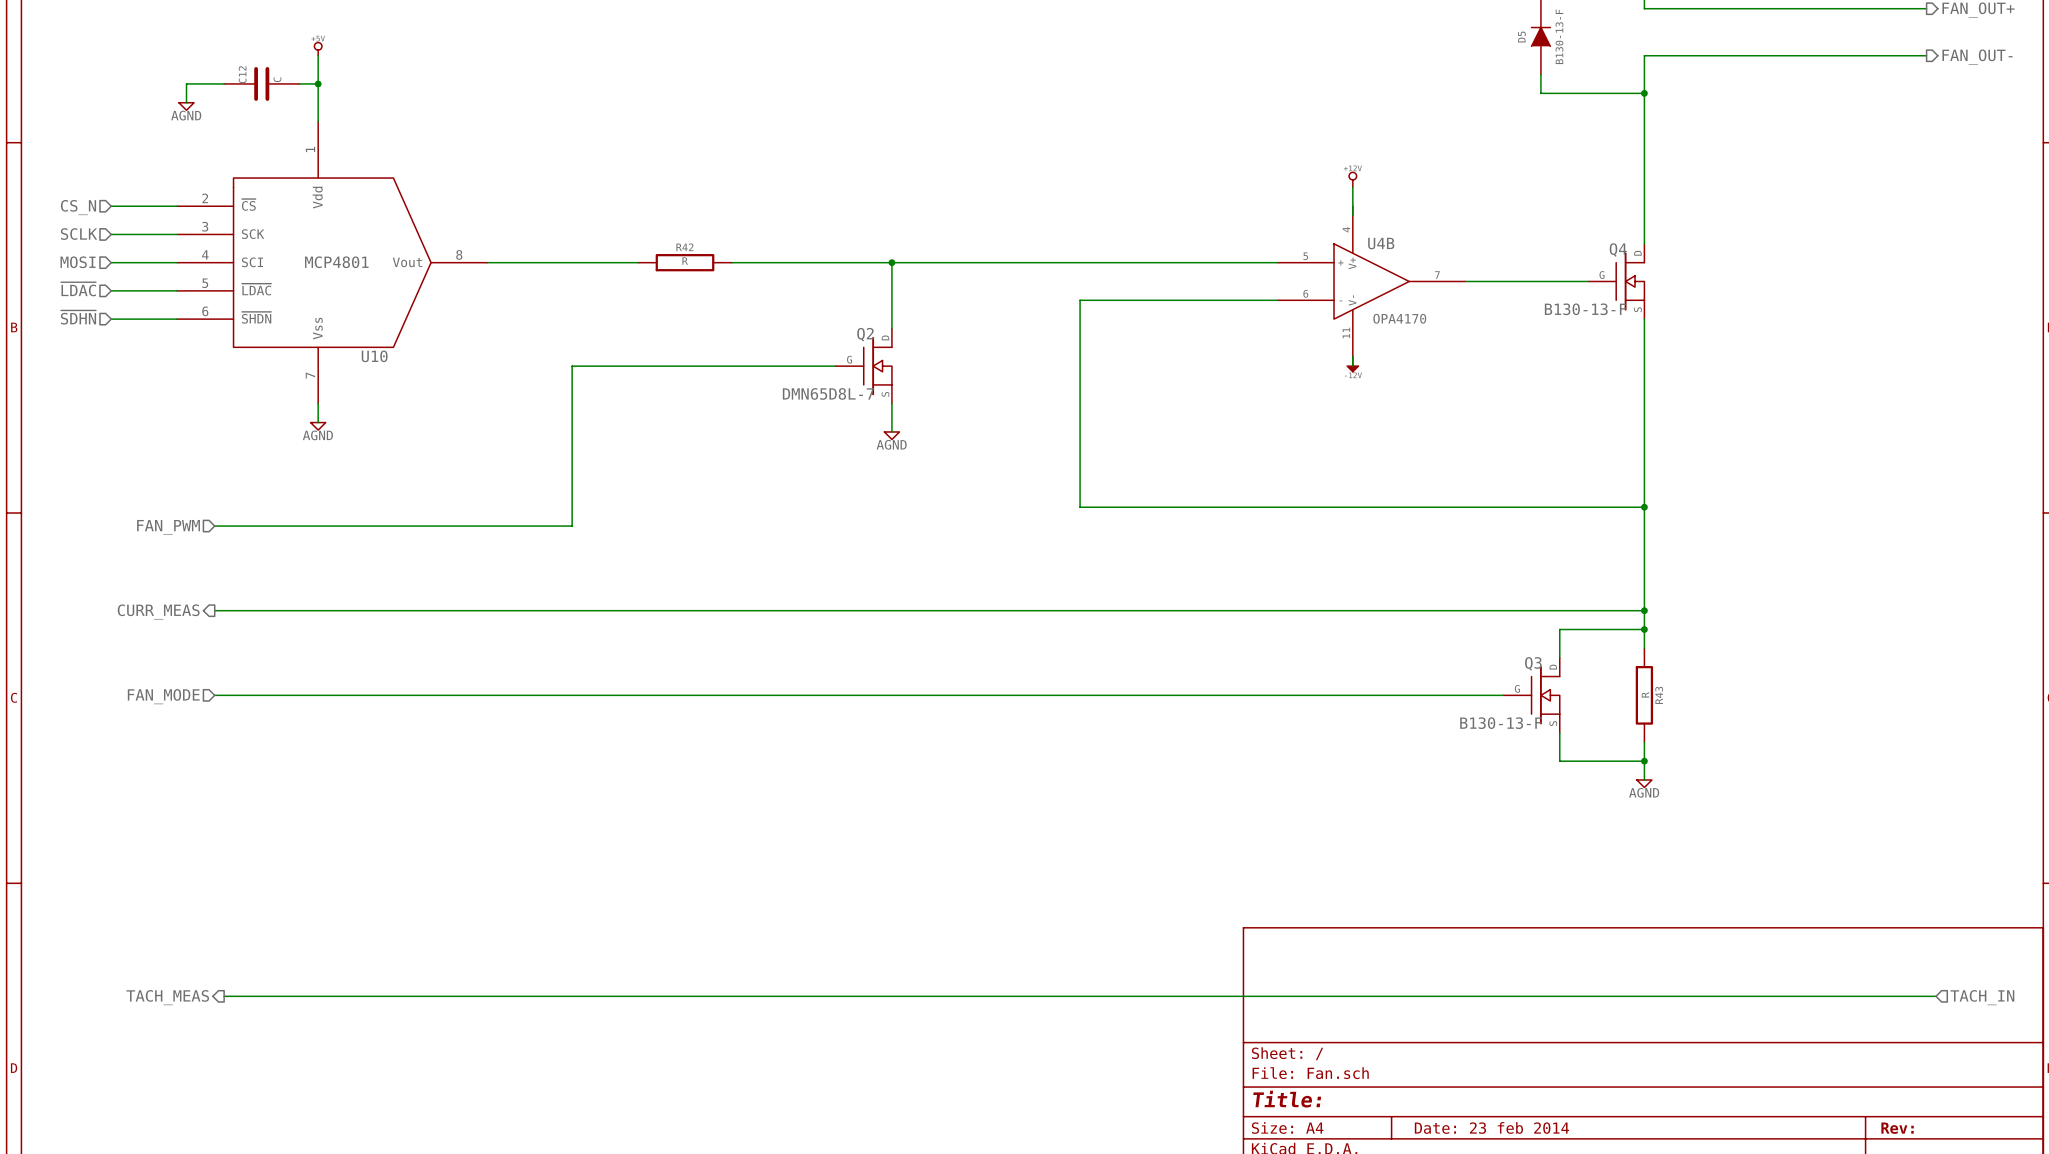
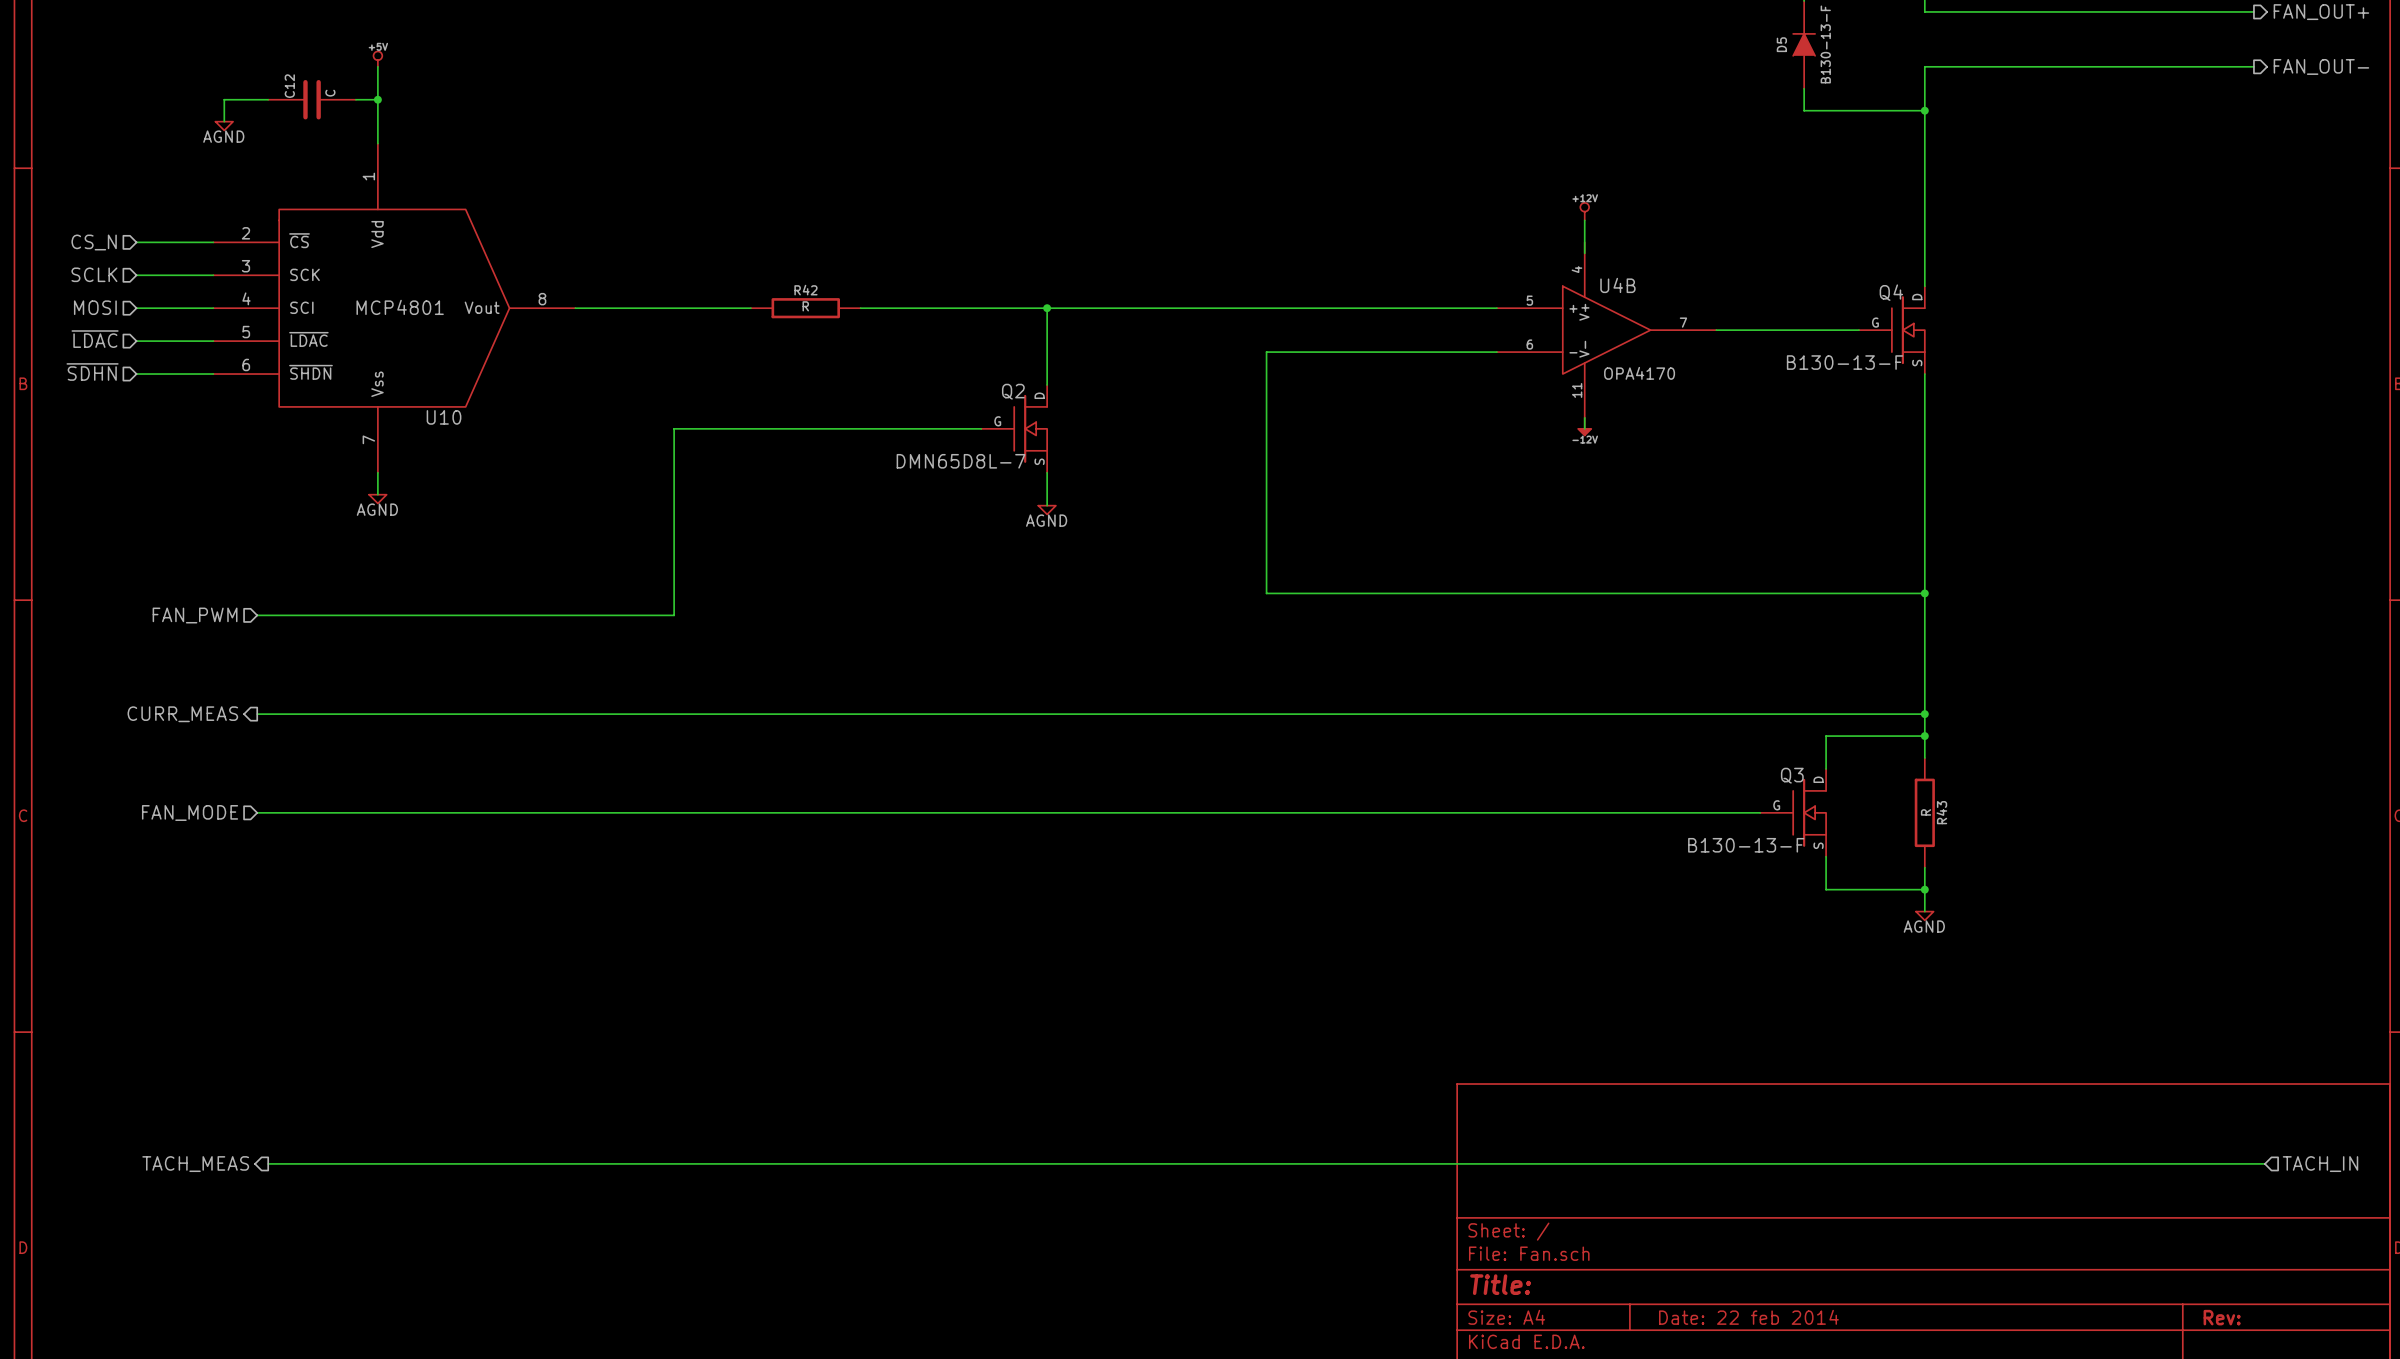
title block: Date: 23 feb 2014 (1491, 1127) -> Date: 22 feb 2014 (1748, 1317)

